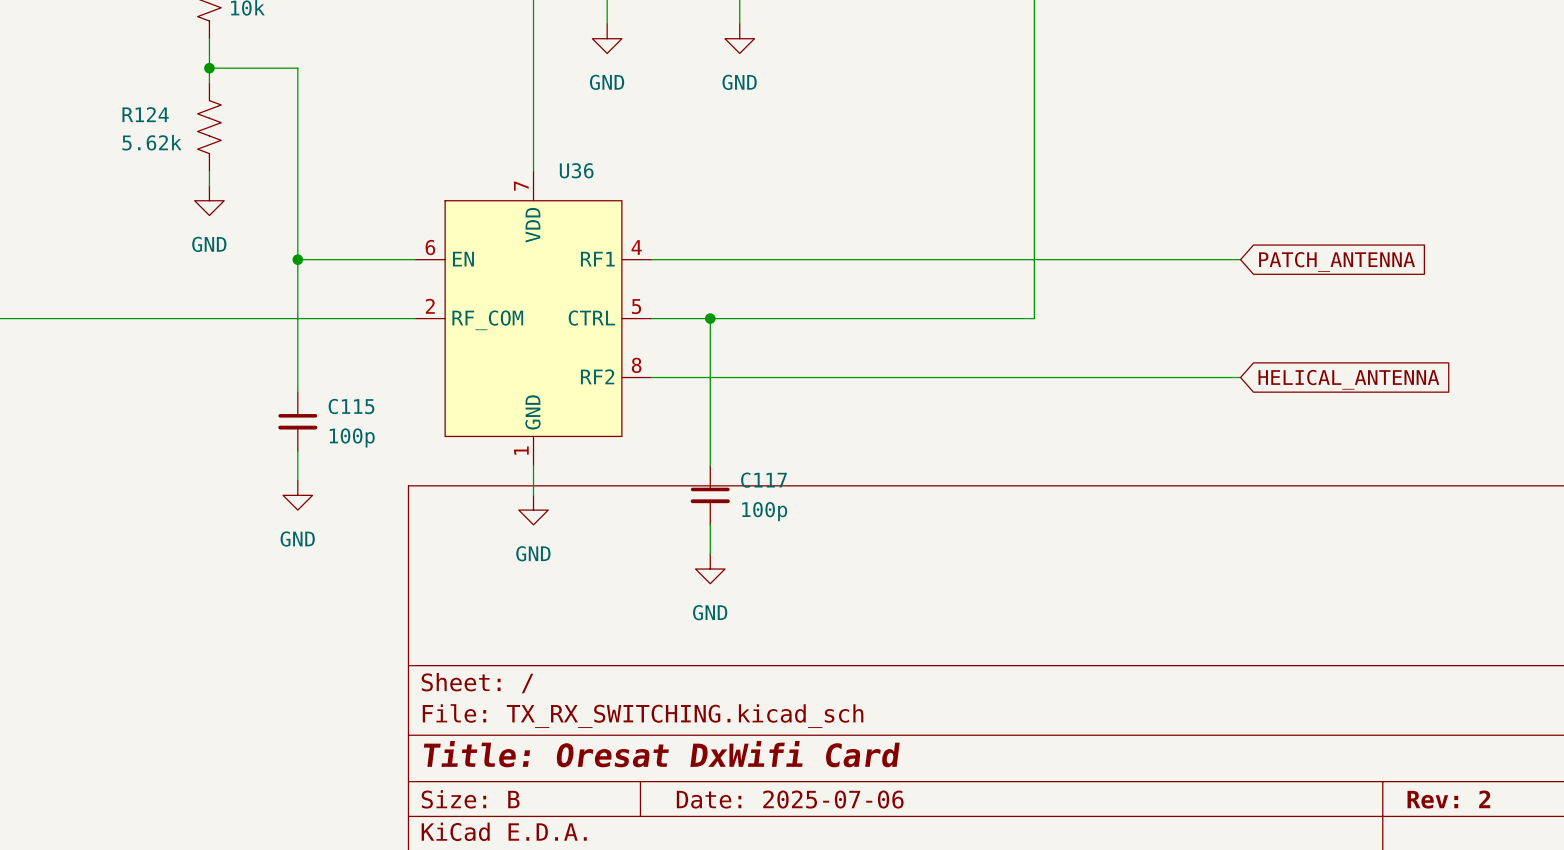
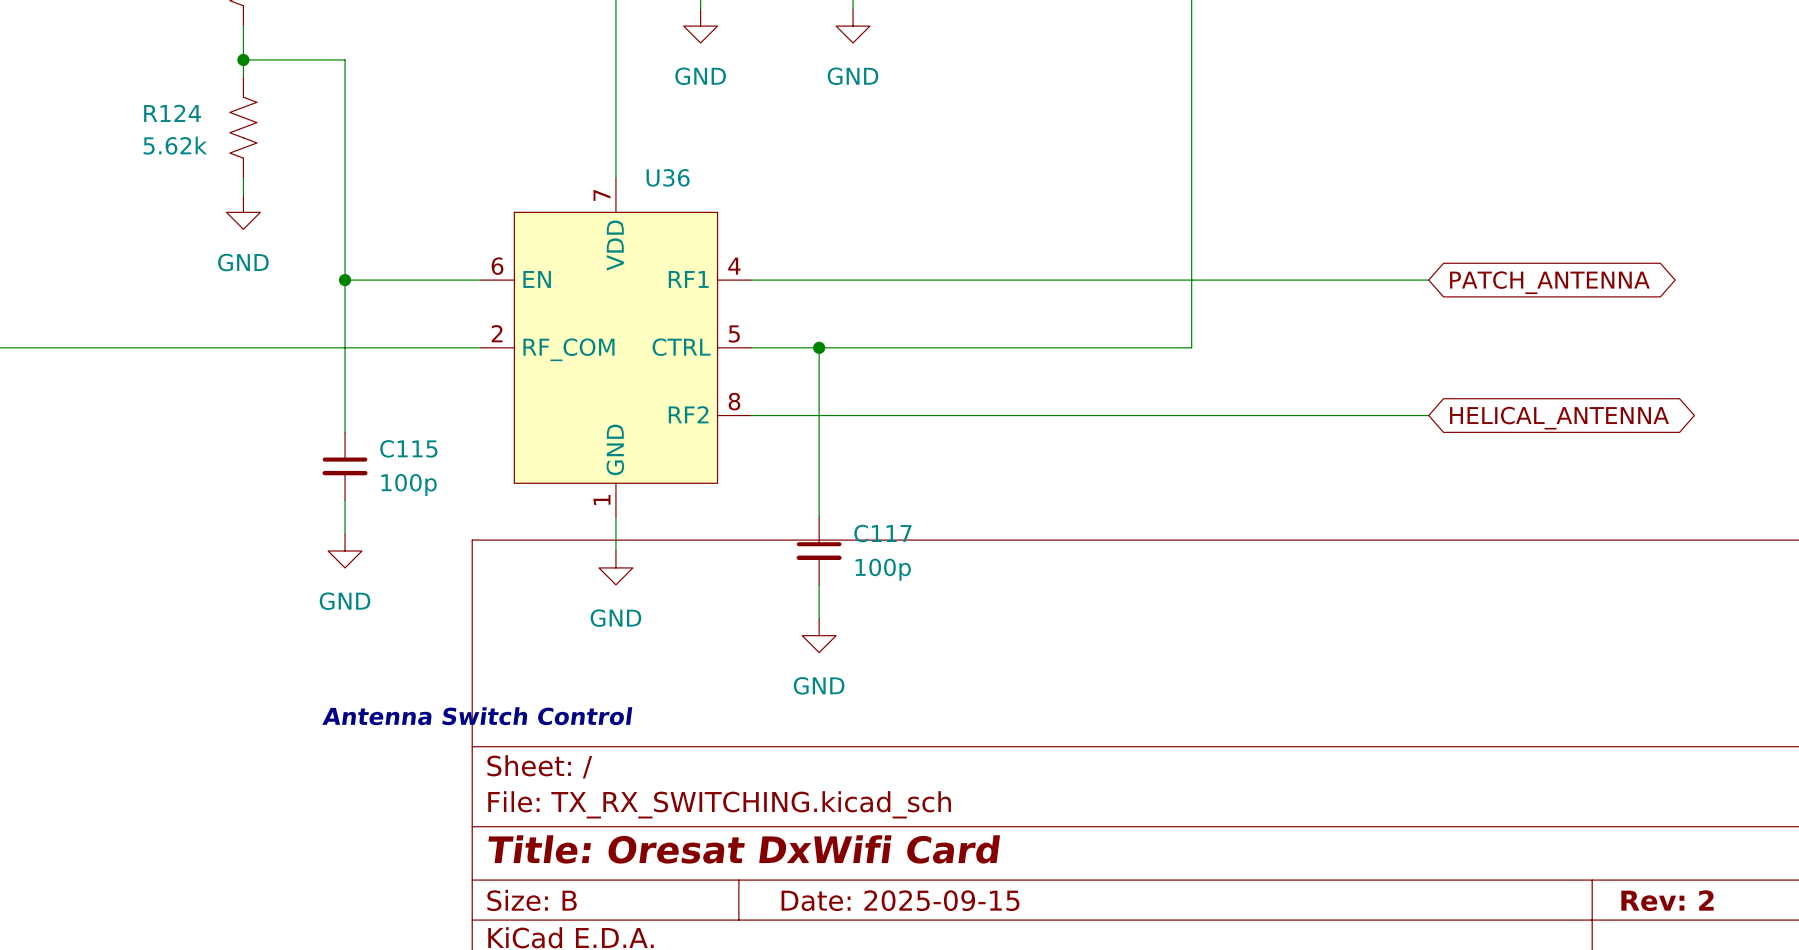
global label shape: input (1337, 261) -> bidirectional (1549, 282)
global label shape: input (1348, 379) -> bidirectional (1559, 418)
text: none -> Antenna Switch Control (477, 716)
title block: Date: 2025-07-06 (790, 799) -> Date: 2025-09-15 (900, 900)

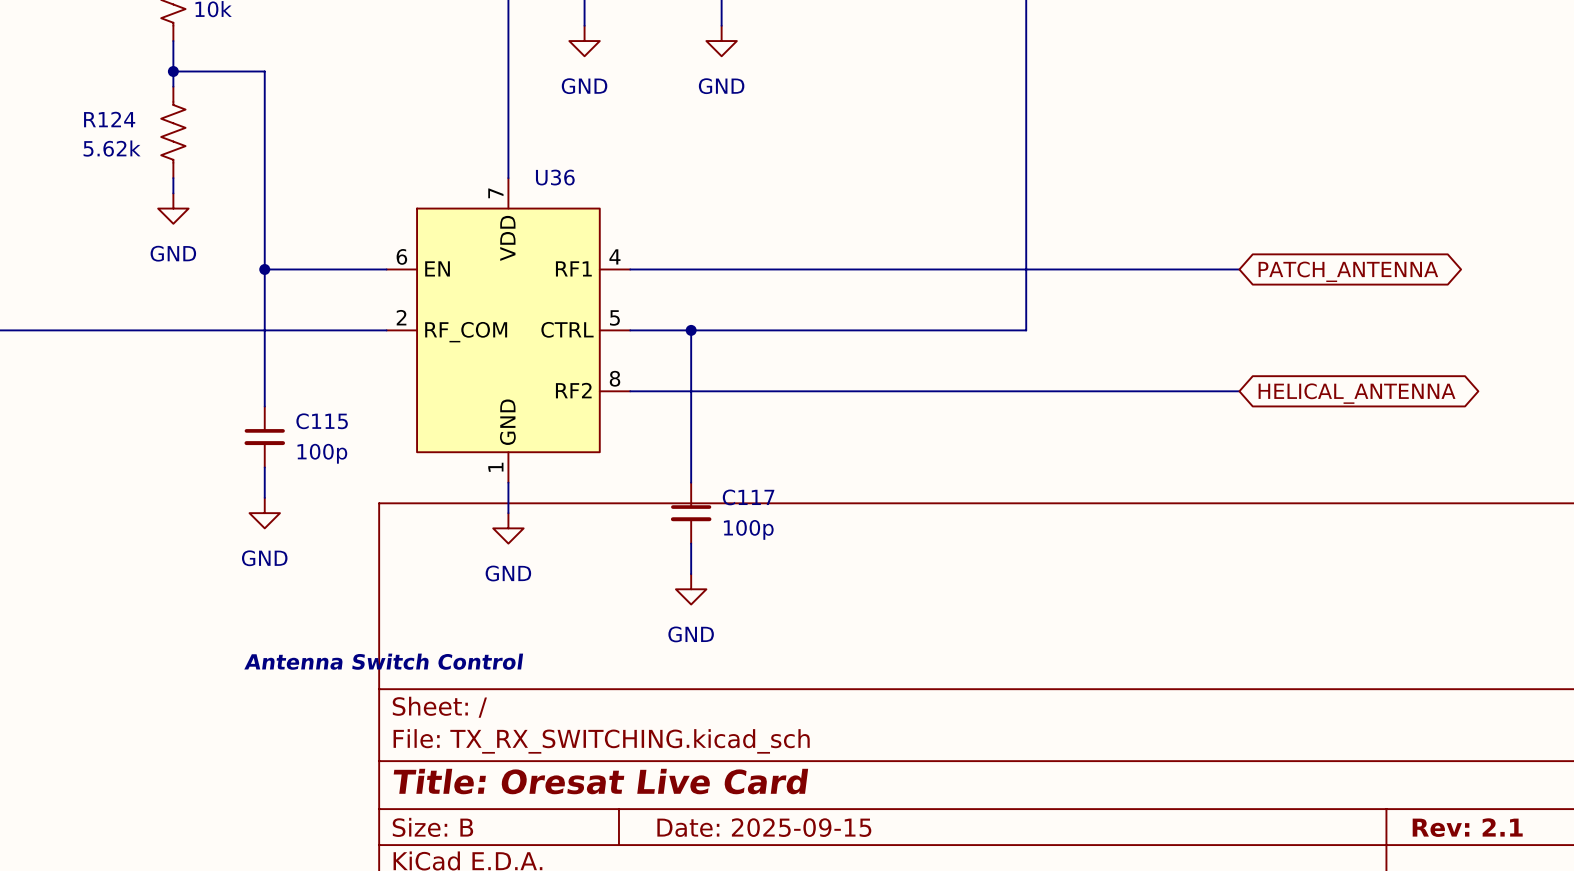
title block: Title: Oresat DxWifi Card (744, 849) -> Title: Oresat Live Card (600, 781)
title block: Rev: 2 (1667, 900) -> Rev: 2.1 (1467, 827)

